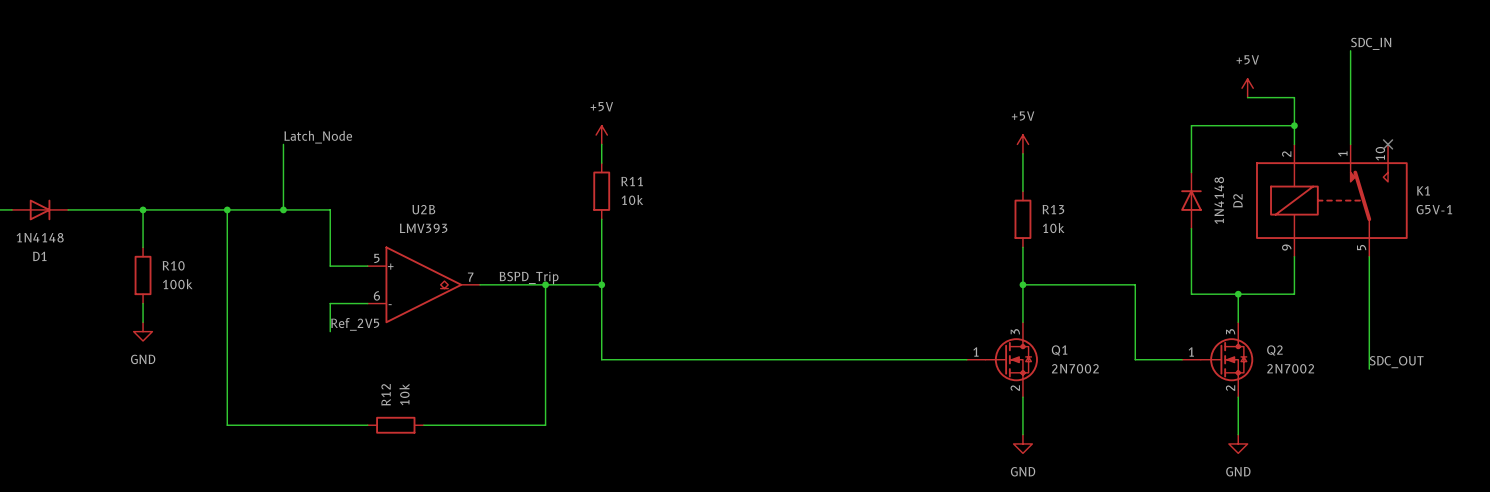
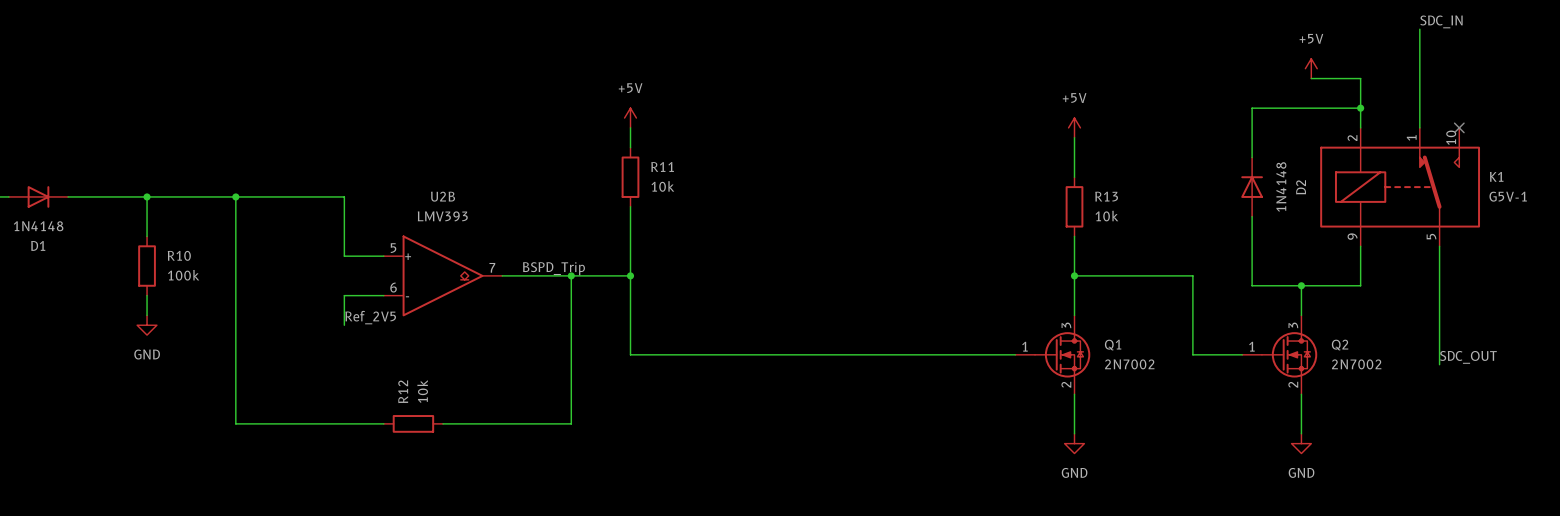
label: Latch_Node (318, 137) -> none
wire: (283, 144) (283, 209) -> none
junction: (283, 209) -> none

